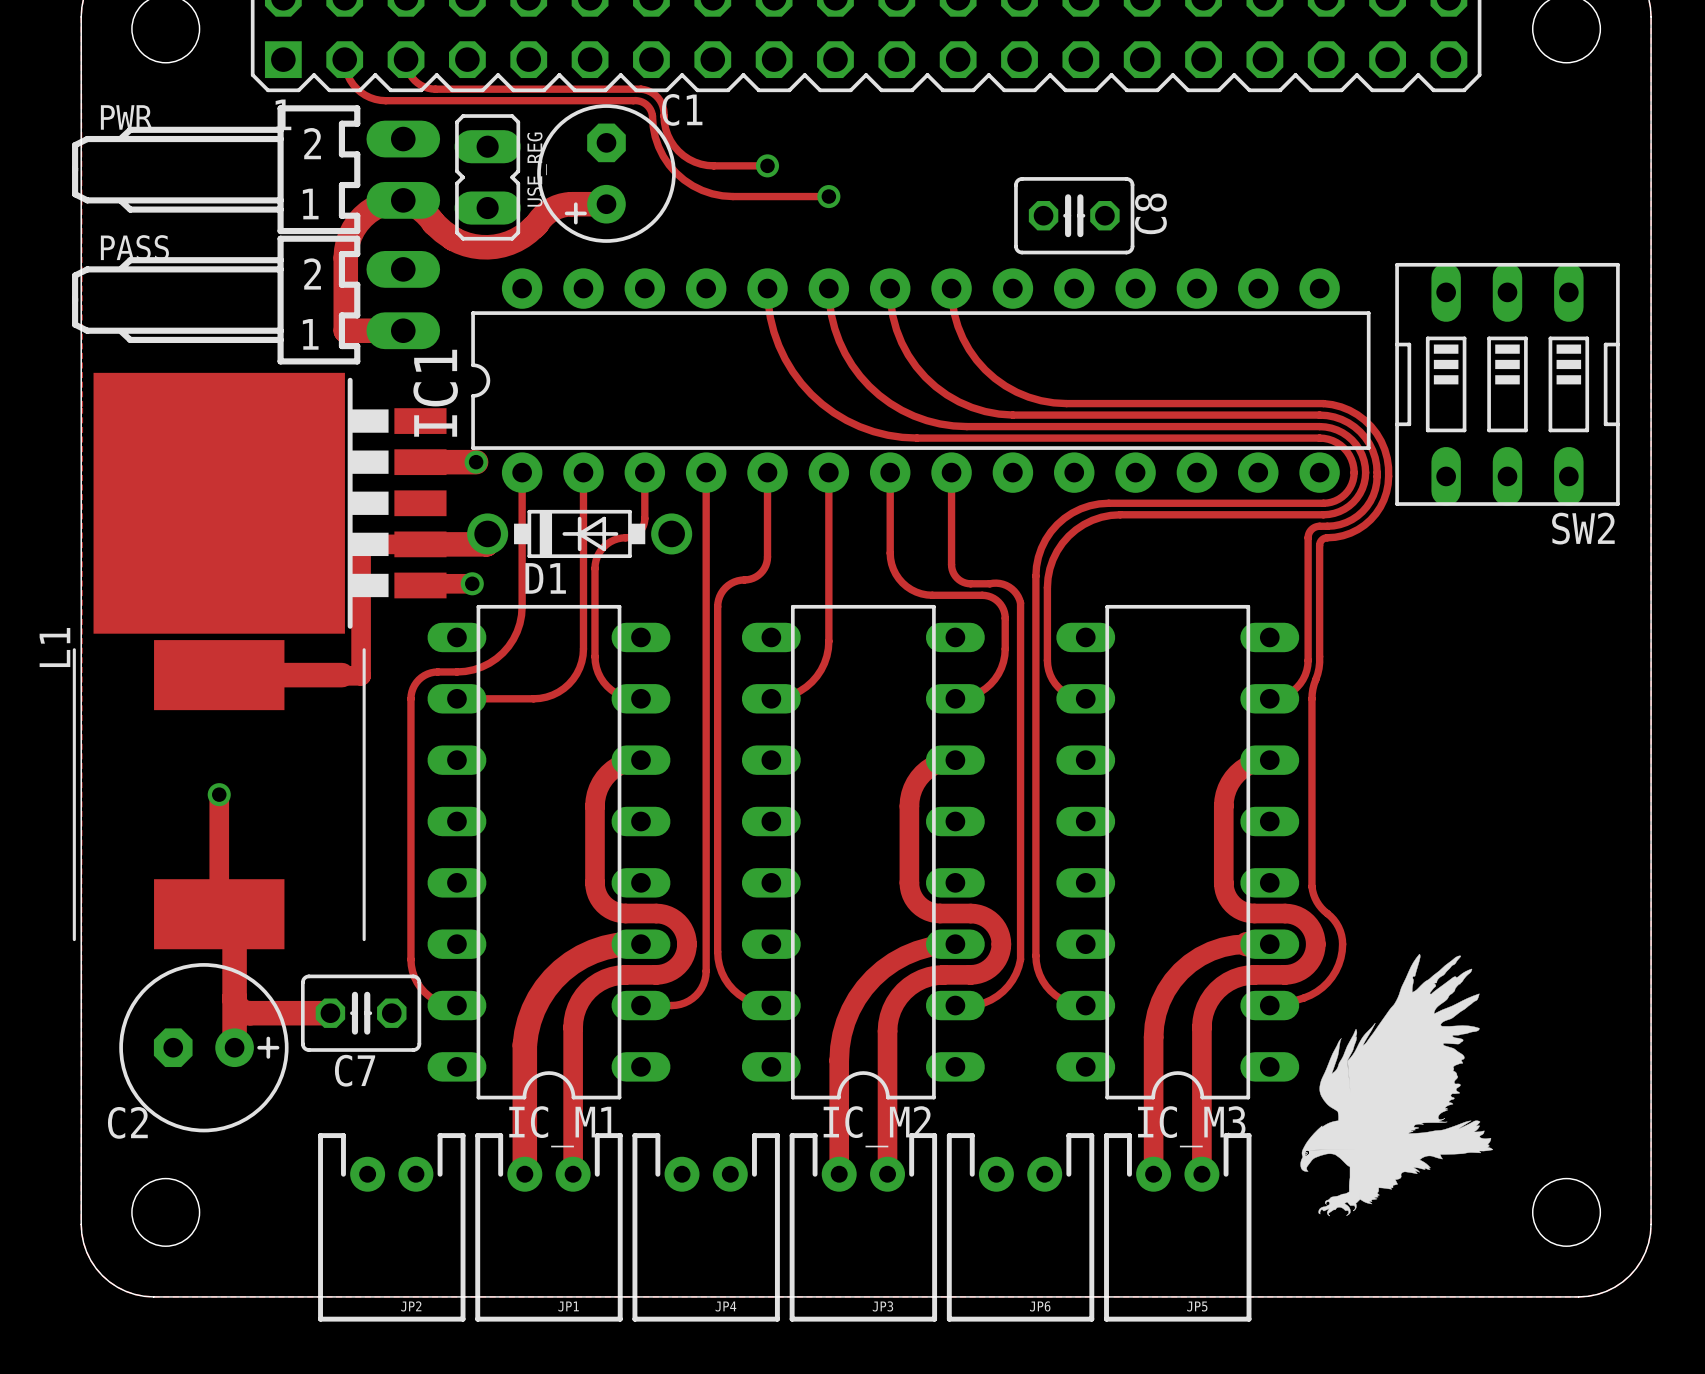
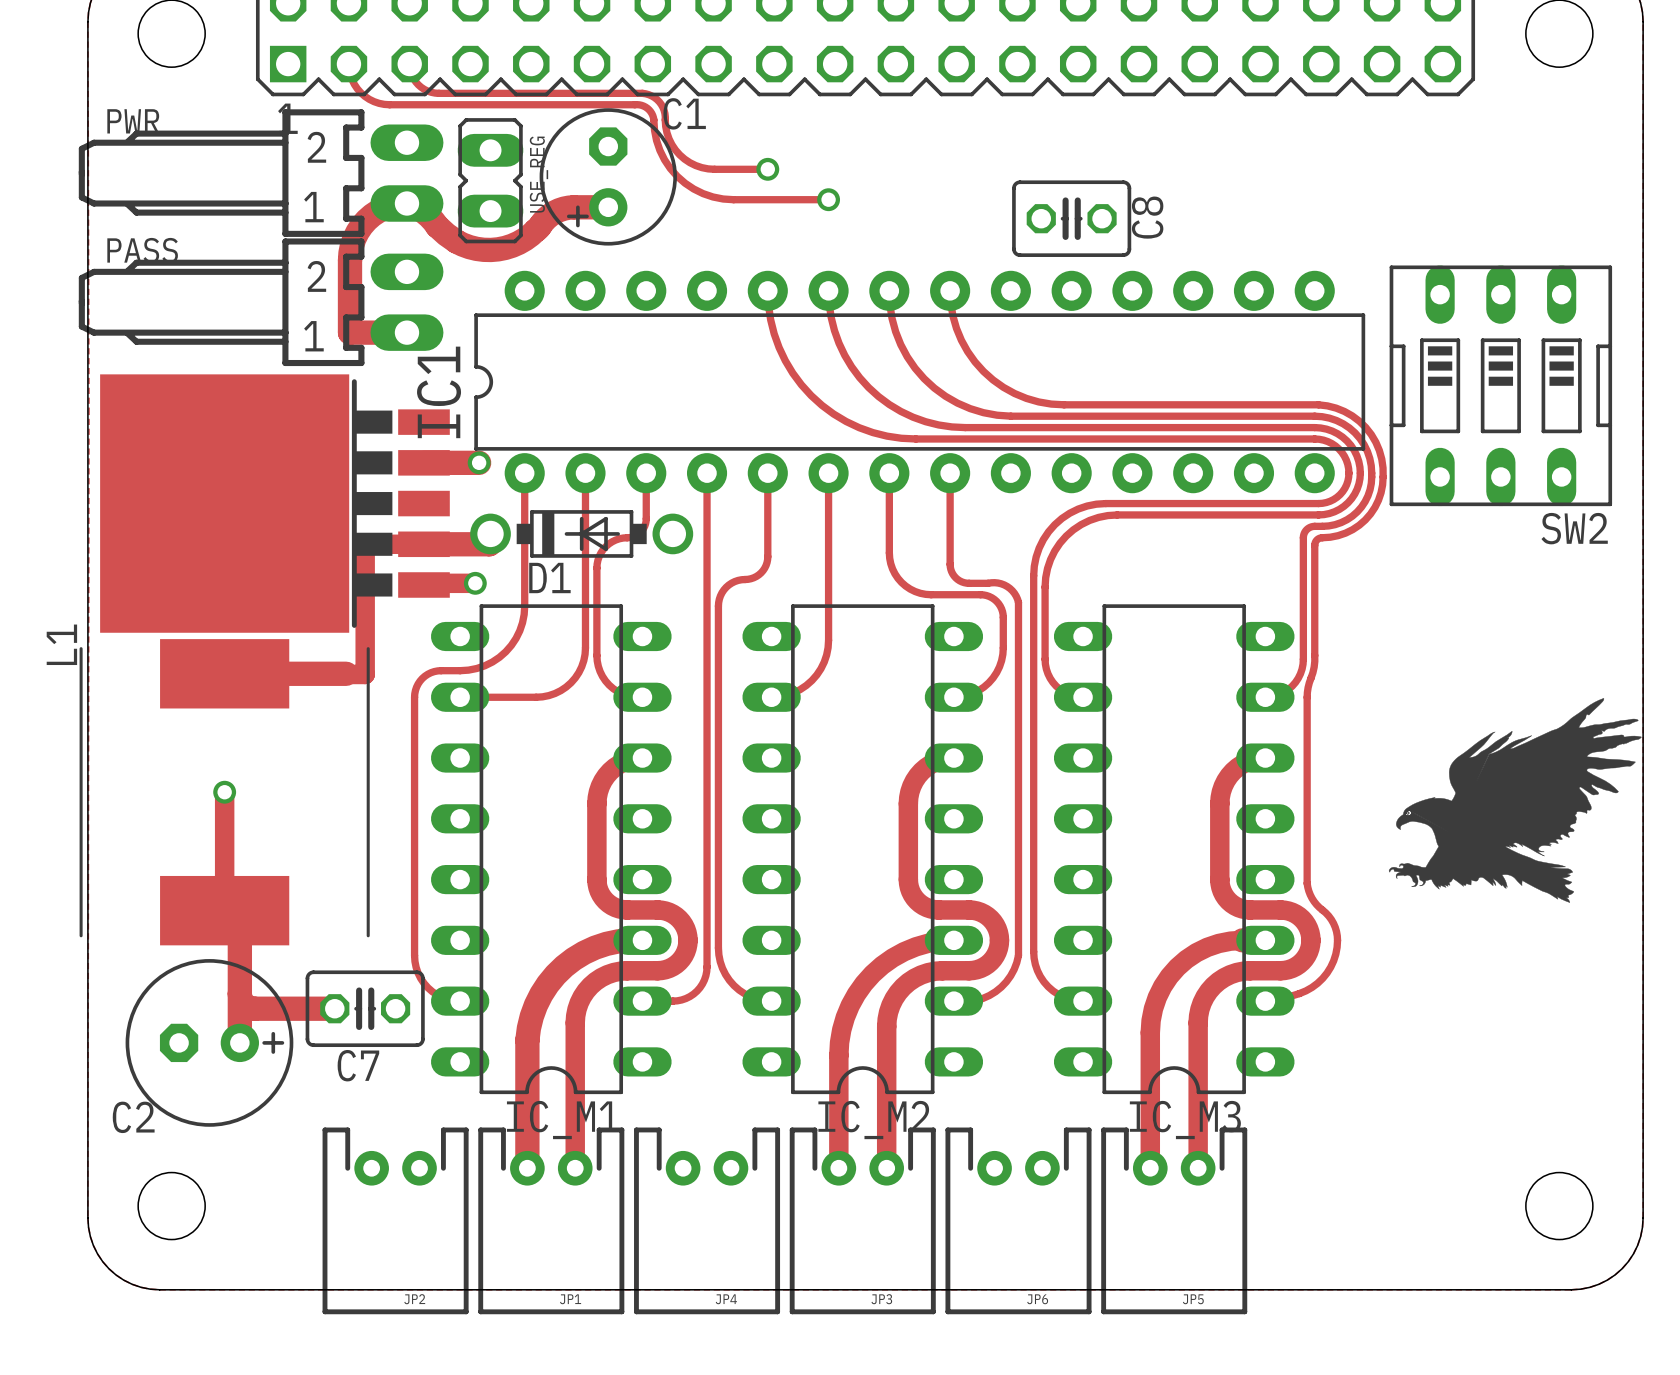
drawing: none -> [1388, 698, 1642, 903]
drawing: [1300, 953, 1494, 1217] -> none

